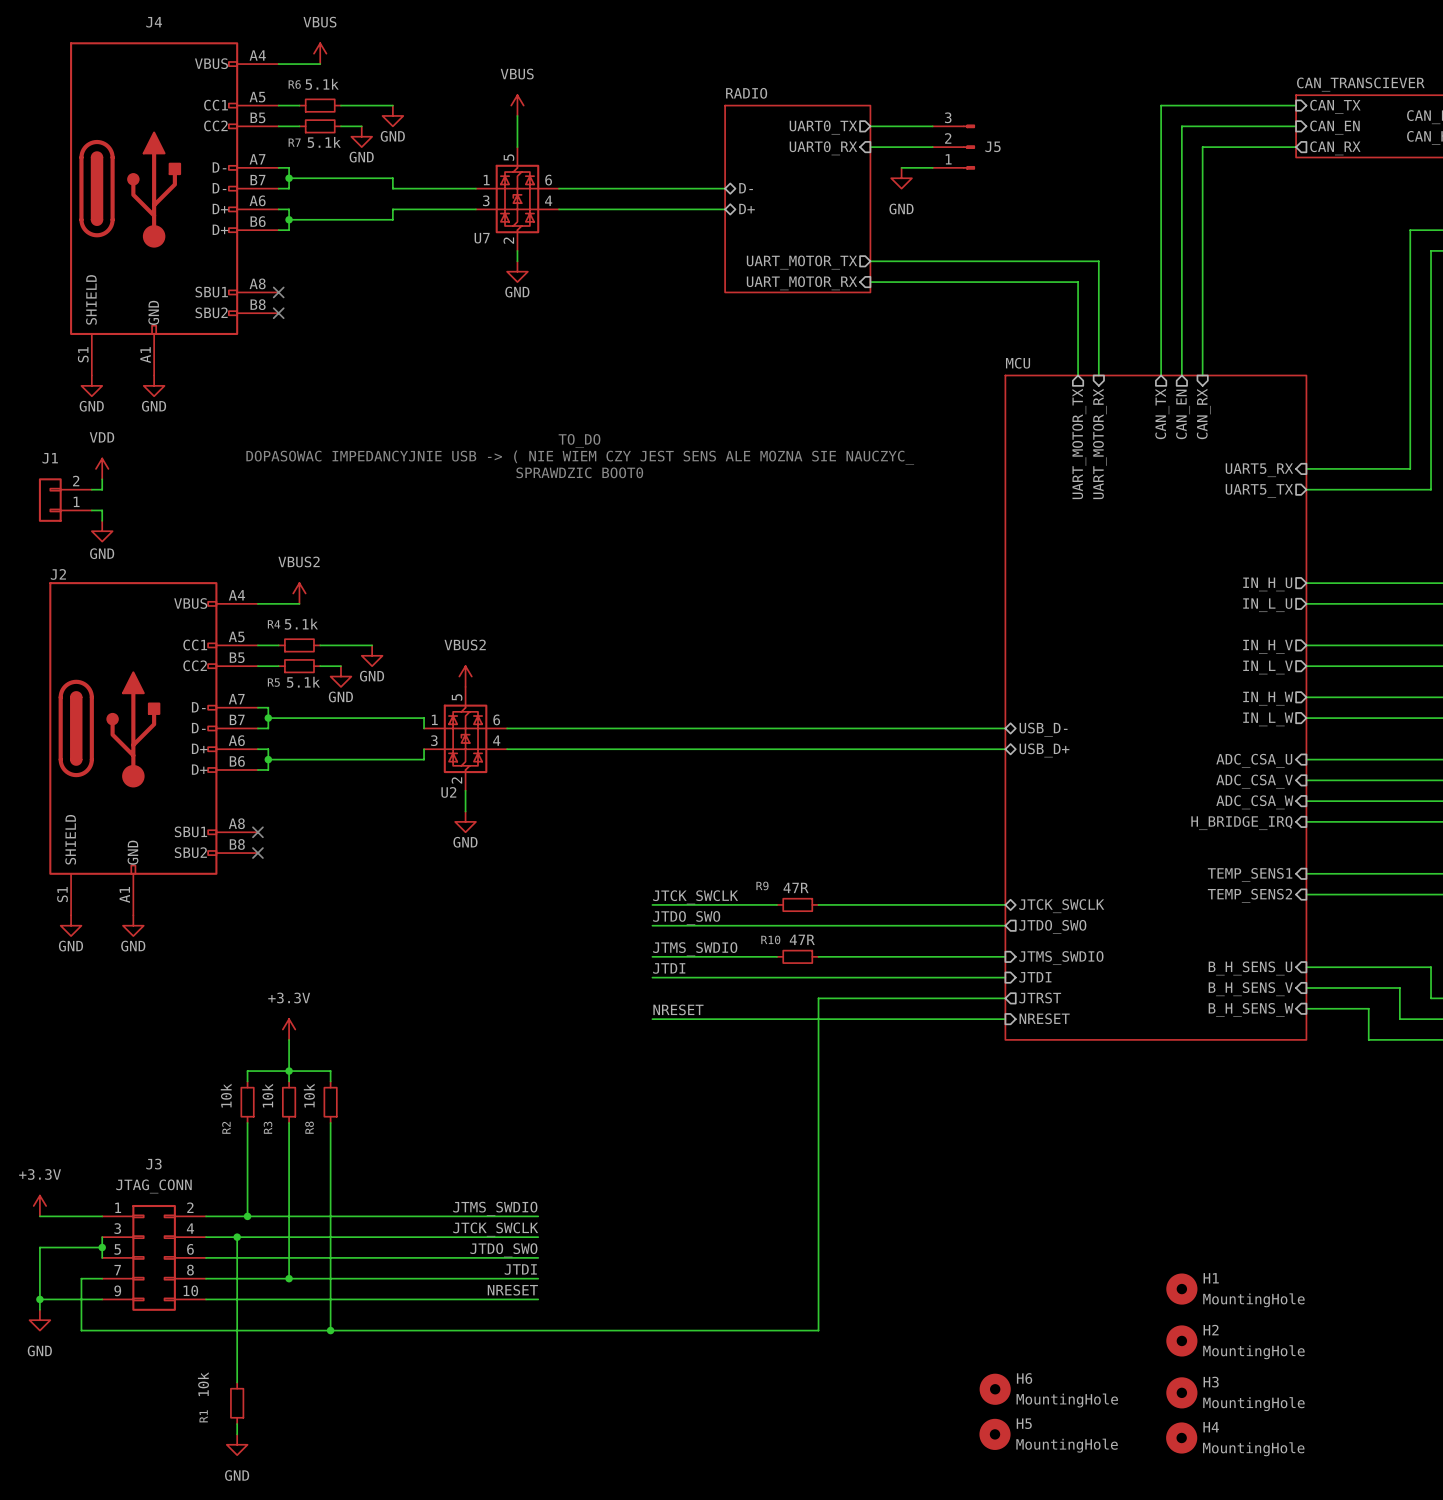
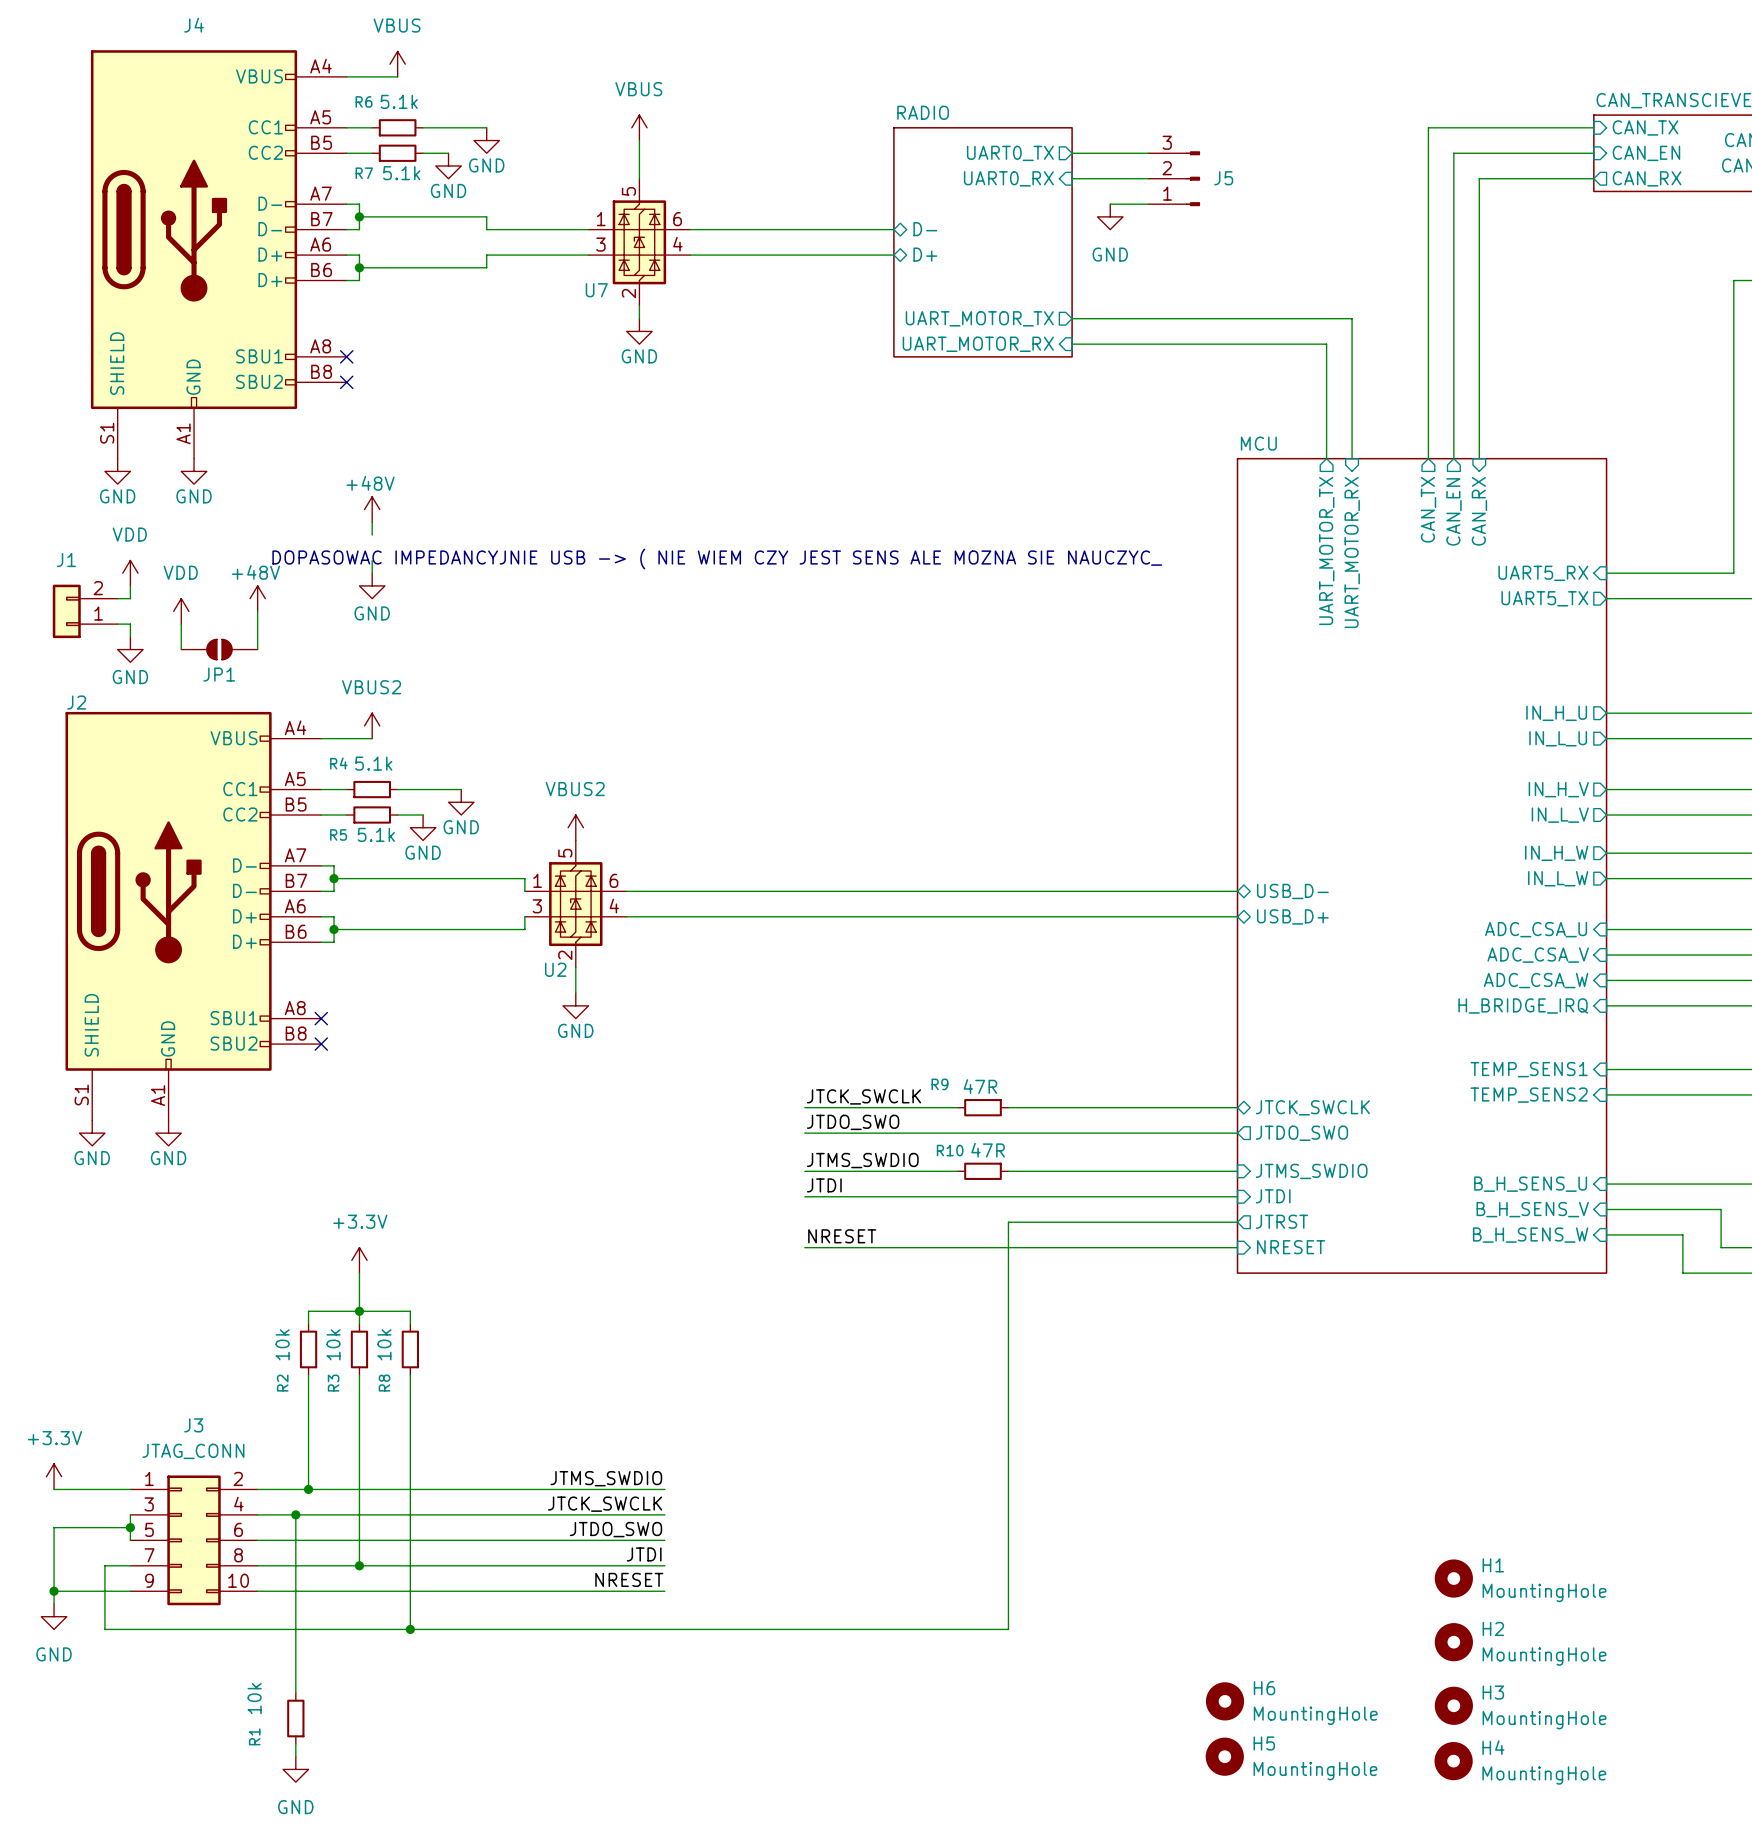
power symbol: none -> +48V (372, 509)
wire: none -> (372, 522) (372, 535)
text: TO_DO (579, 440) -> none
wire: none -> (372, 560) (372, 573)
text: SPRAWDZIC BOOT0 (579, 472) -> none
power symbol: none -> GND (372, 585)
power symbol: none -> +48V (257, 598)
power symbol: none -> VDD (181, 611)
wire: none -> (257, 611) (257, 649)
wire: none -> (181, 624) (181, 649)
JP1: none -> (219, 649)

